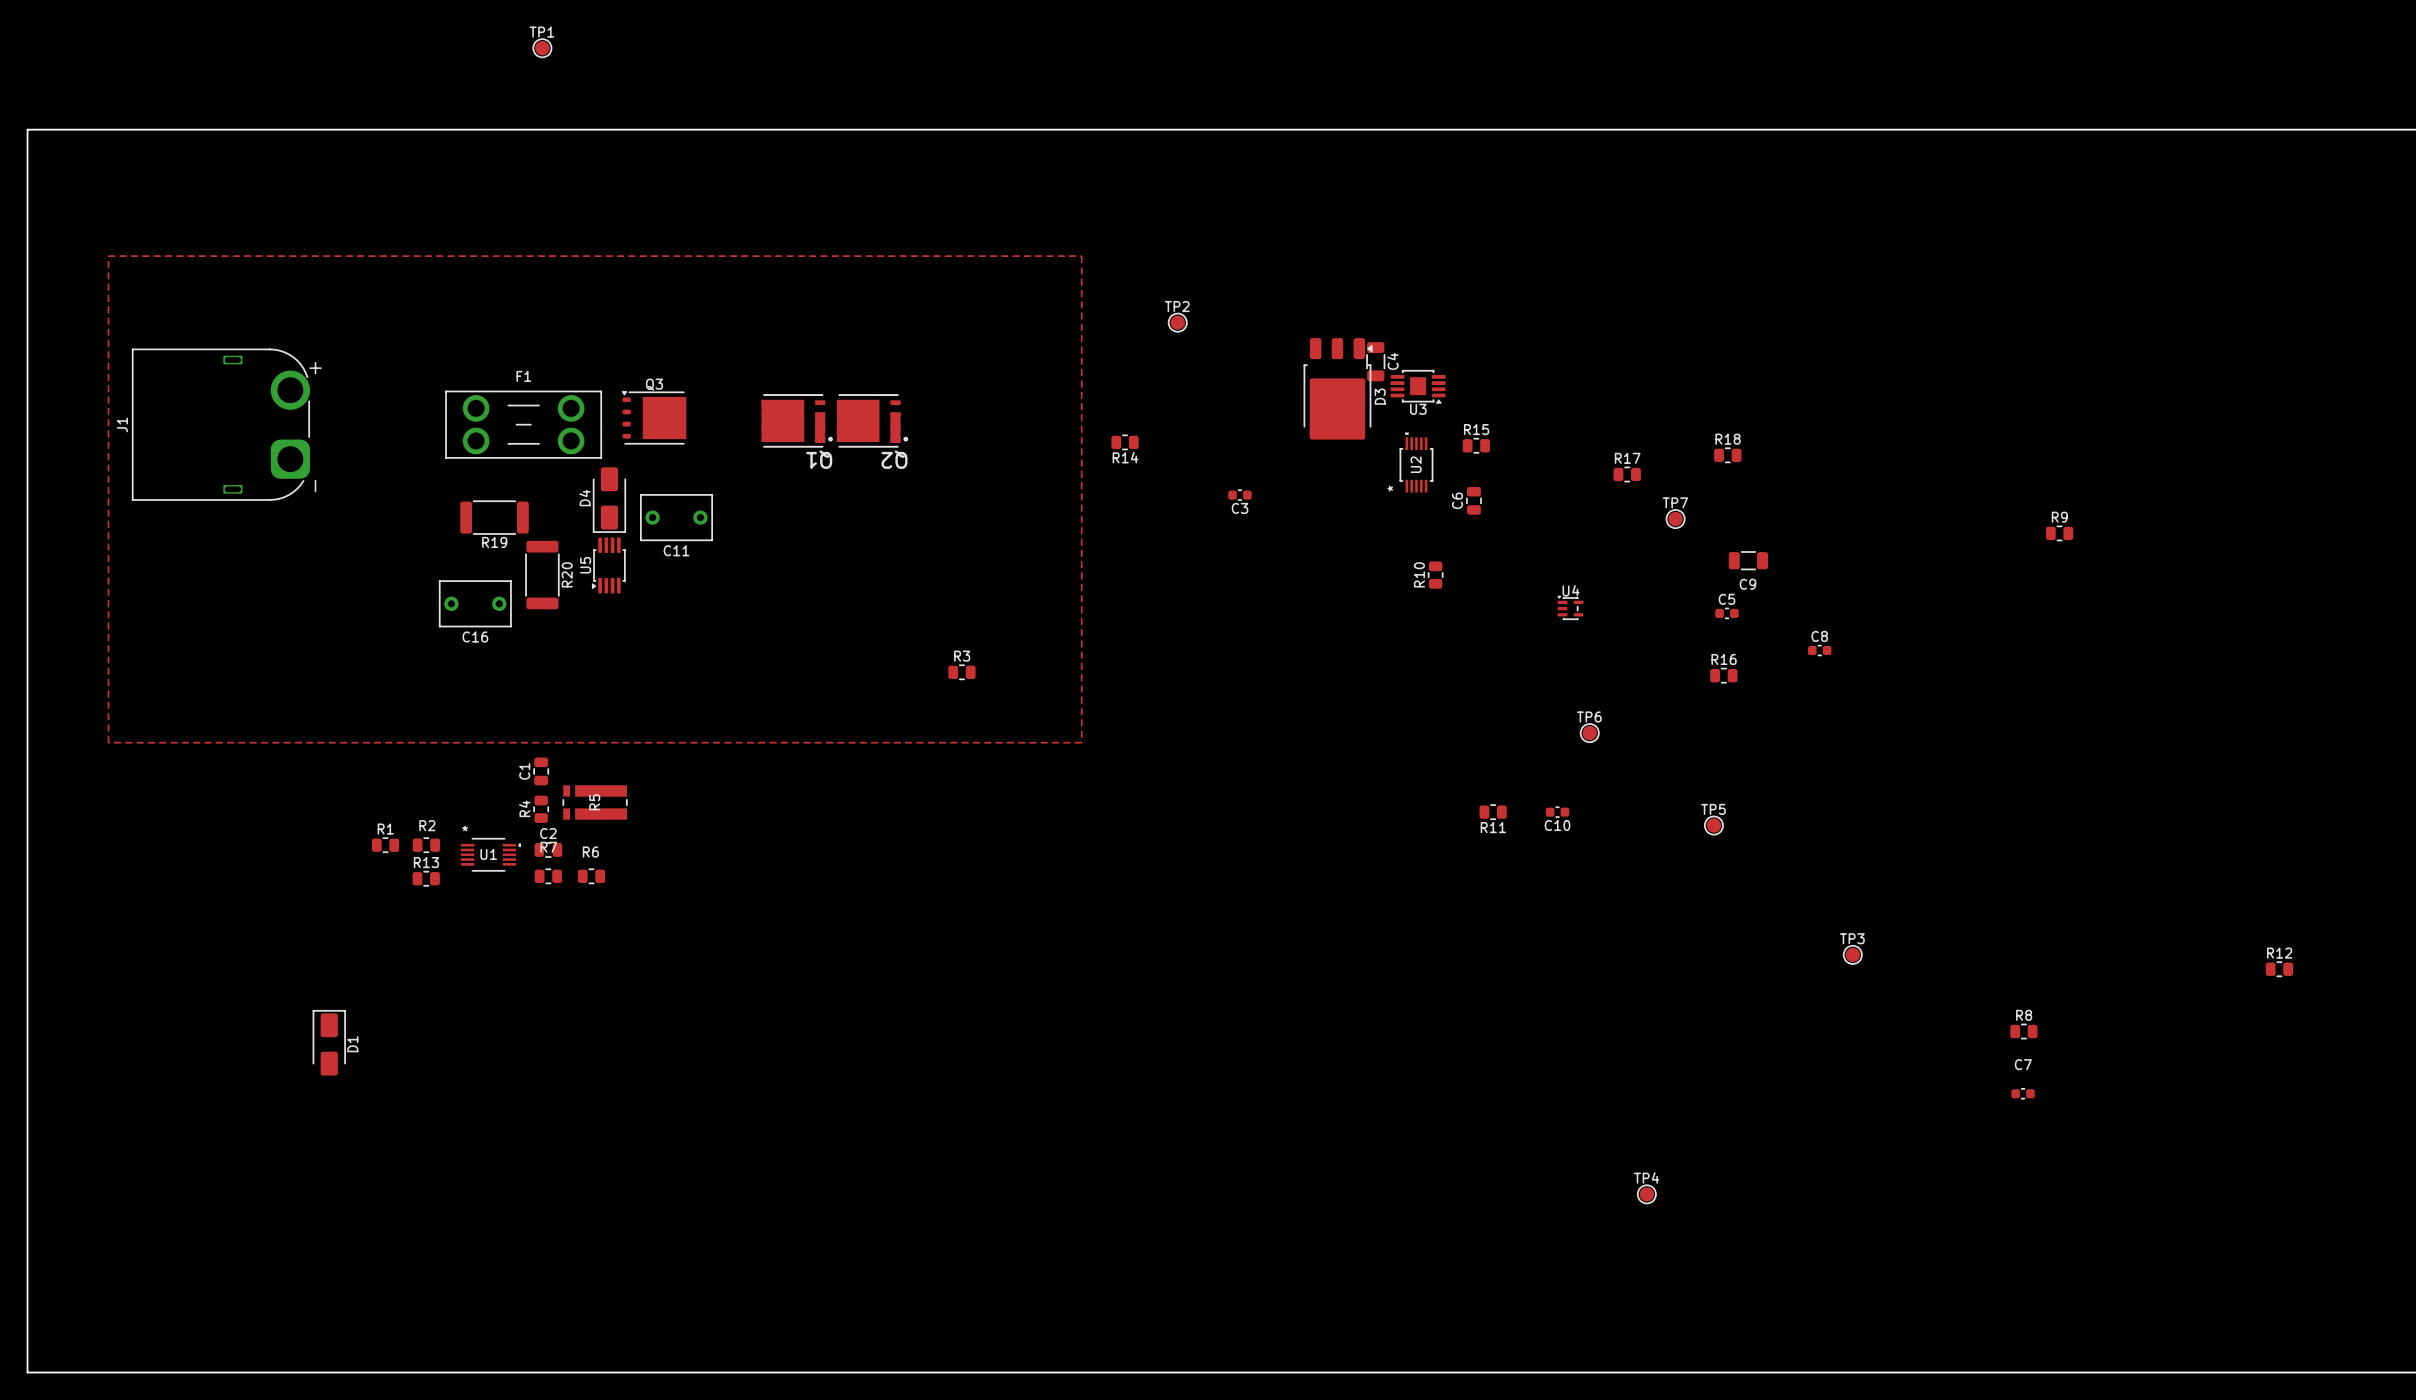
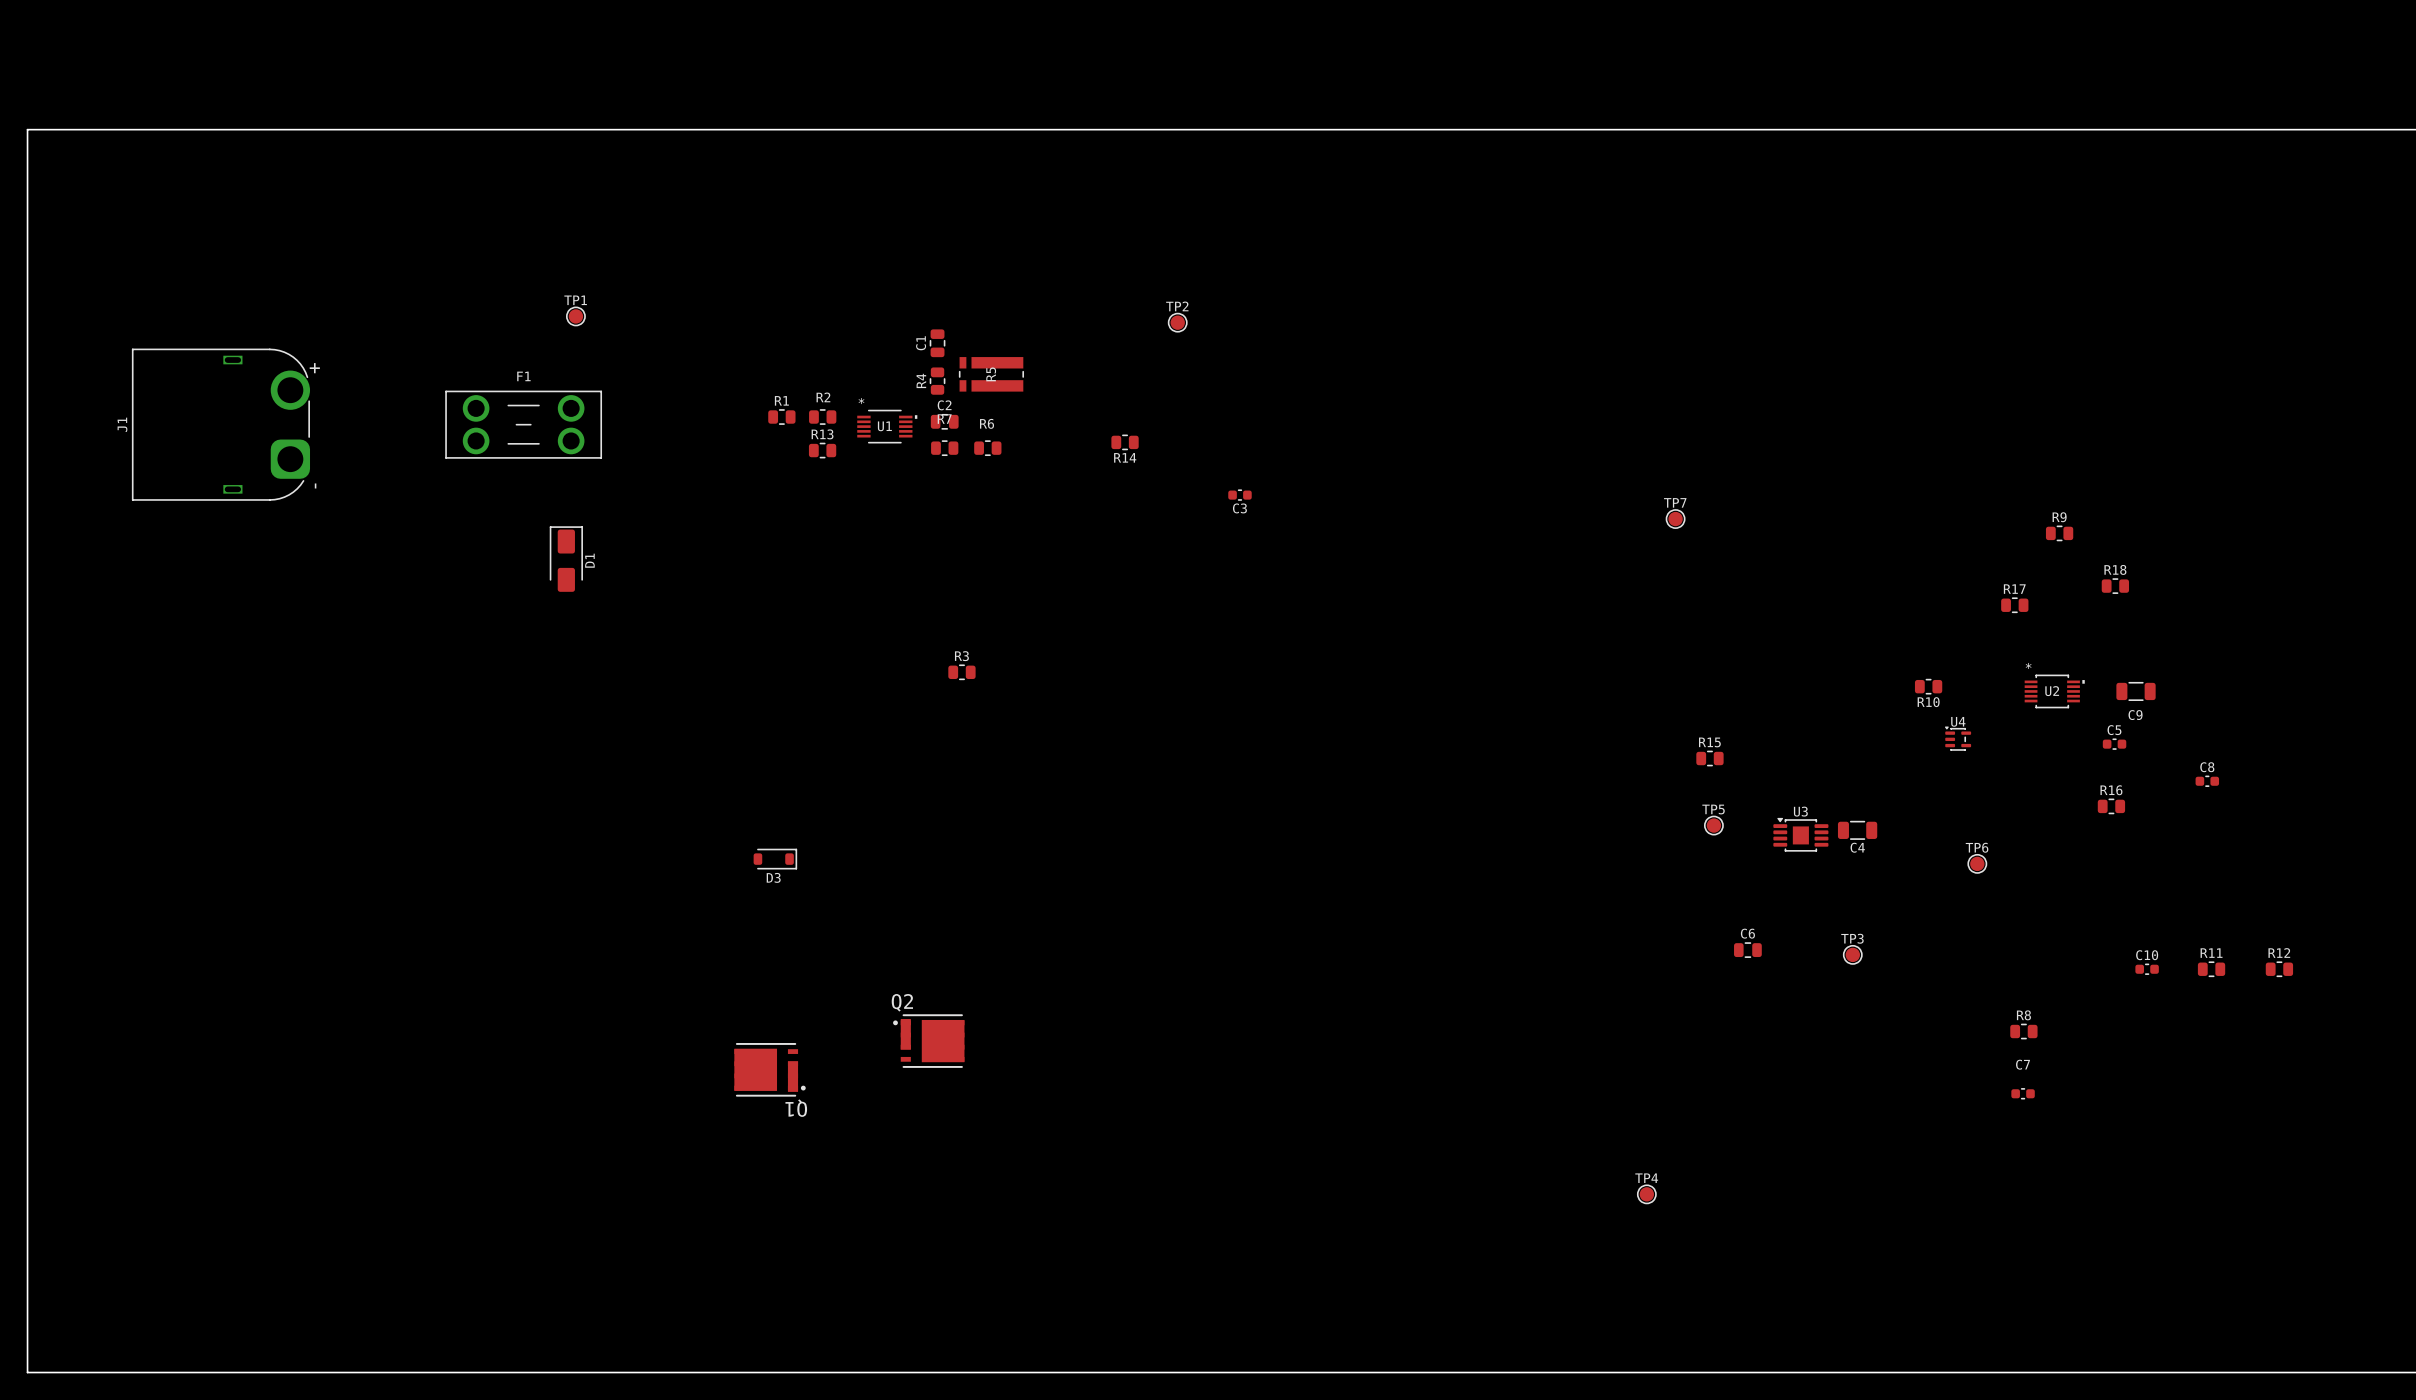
TP1 position: (542, 48) -> (575, 316)
top zone outline: (108, 256) (1081, 256) (1081, 742) (108, 742) (108, 256) -> none
D3 footprint: [1303, 338, 1373, 440] -> [753, 848, 797, 870]
C4 rotation: 0° (1375, 361) -> 90° clockwise (1857, 830)
C4 position: (1375, 361) -> (1857, 830)
U3 rotation: 0° (1418, 386) -> 180° (1800, 834)
U3 position: (1418, 386) -> (1800, 834)
D3 name position: D3 (1380, 396) -> D3 (773, 877)
Q3: (653, 417) -> none
Q1 position: (797, 420) -> (770, 1069)
Q2 rotation: 0° (872, 420) -> 180° (928, 1041)
Q2 position: (872, 420) -> (928, 1041)
R15 position: (1476, 445) -> (1709, 758)
R18 position: (1727, 455) -> (2115, 586)
U2 rotation: 0° (1416, 462) -> 90° clockwise (2054, 691)
U2 position: (1416, 462) -> (2054, 691)
R17 position: (1627, 474) -> (2014, 605)
D4: (609, 499) -> none
C6 rotation: 0° (1473, 500) -> 90° clockwise (1747, 950)
C6 position: (1473, 500) -> (1747, 950)
R19: (494, 517) -> none
C11: (676, 517) -> none
C9 position: (1748, 560) -> (2136, 691)
U5: (608, 565) -> none
R10 name position: R10 (1419, 574) -> R10 (1928, 702)
R20: (542, 575) -> none
R10 rotation: 0° (1435, 575) -> 90° clockwise (1928, 686)
R10 position: (1435, 575) -> (1928, 686)
C16: (475, 603) -> none
U4 position: (1570, 607) -> (1958, 738)
C5 position: (1726, 613) -> (2114, 744)
C8 position: (1819, 650) -> (2207, 781)
R16 position: (1723, 675) -> (2111, 806)
TP6 position: (1589, 733) -> (1977, 863)
C1 position: (541, 771) -> (937, 343)
R5 position: (595, 802) -> (991, 374)
R4 position: (541, 809) -> (937, 381)
R11 position: (1493, 812) -> (2211, 969)
C10 position: (1557, 812) -> (2147, 969)
C10 name position: C10 (1557, 825) -> C10 (2147, 955)
R11 name position: R11 (1493, 827) -> R11 (2211, 953)
R1 position: (385, 845) -> (781, 417)
R2 position: (426, 845) -> (822, 417)
C2 position: (548, 849) -> (944, 421)
U1 position: (490, 854) -> (887, 426)
R7 position: (548, 876) -> (944, 448)
R6 position: (591, 876) -> (987, 448)
R13 position: (426, 878) -> (822, 450)
D1 position: (329, 1042) -> (566, 559)

